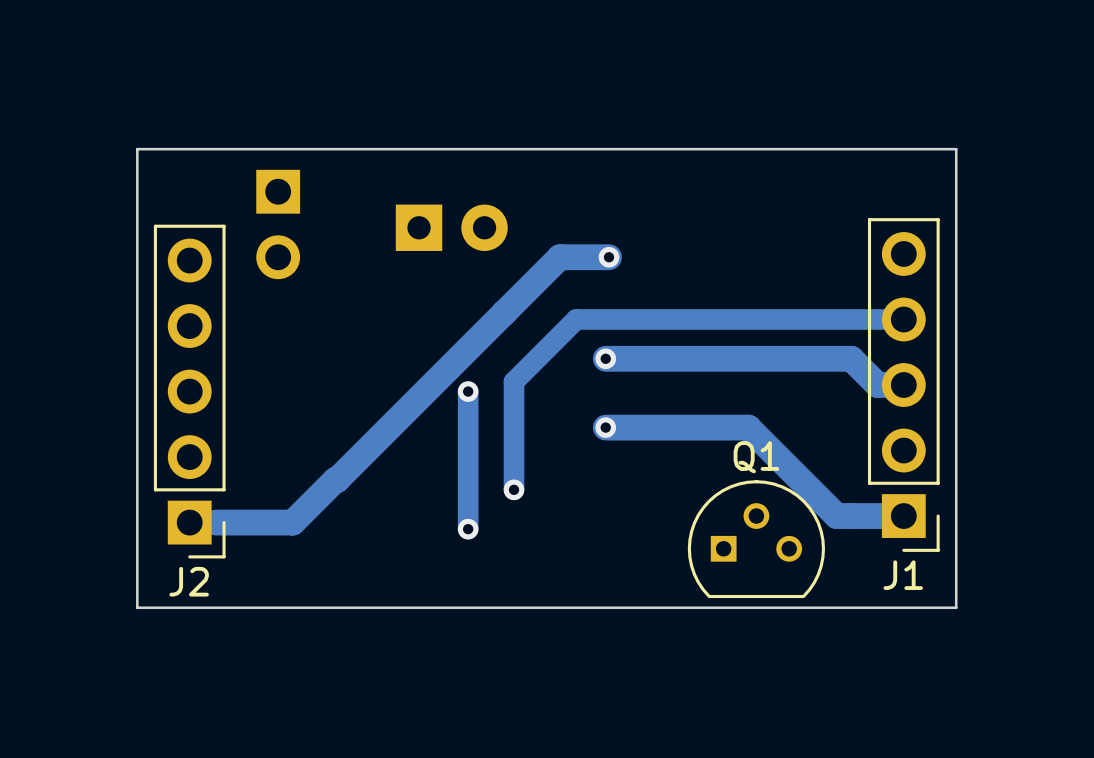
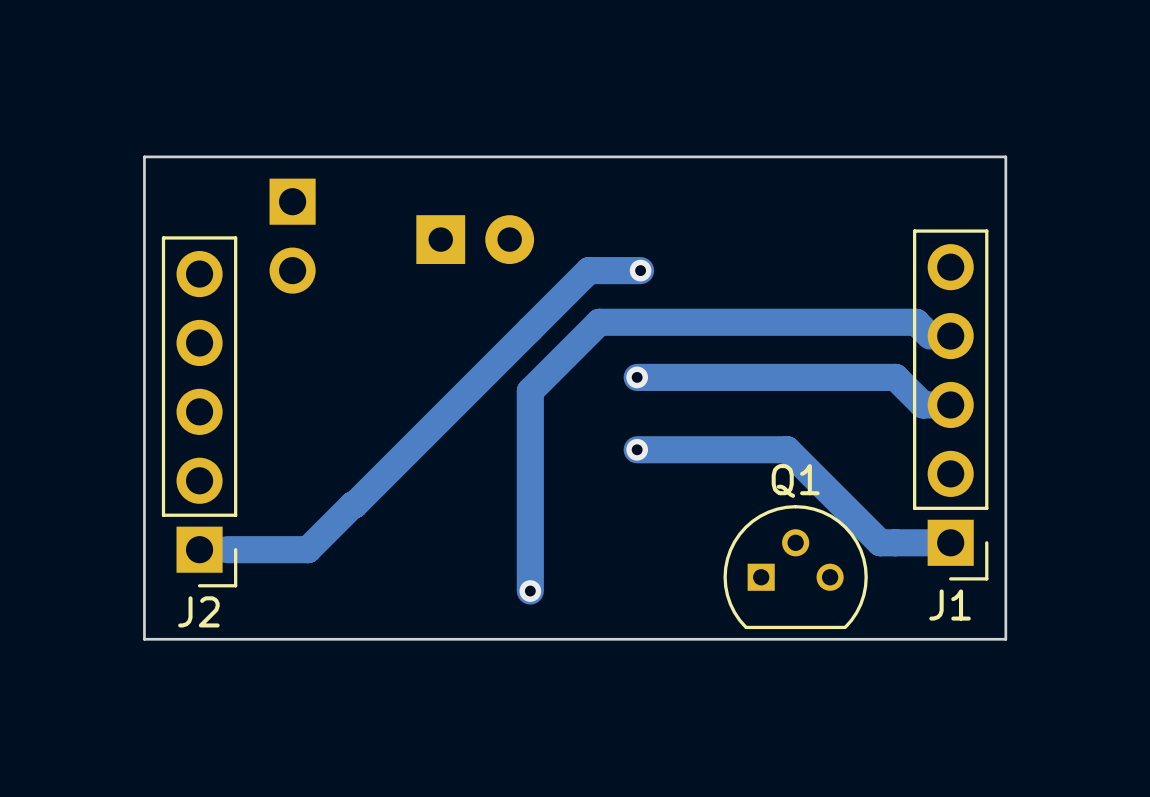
track: (884, 319) (576, 319) (514, 381) (514, 489) -> (930, 336) (916, 322) (599, 322) (530, 391) (530, 591)
track: (468, 391) (468, 529) -> none
via: (468, 391) -> none
via: (514, 489) -> none
via: (468, 529) -> none
via: none -> (530, 591)

